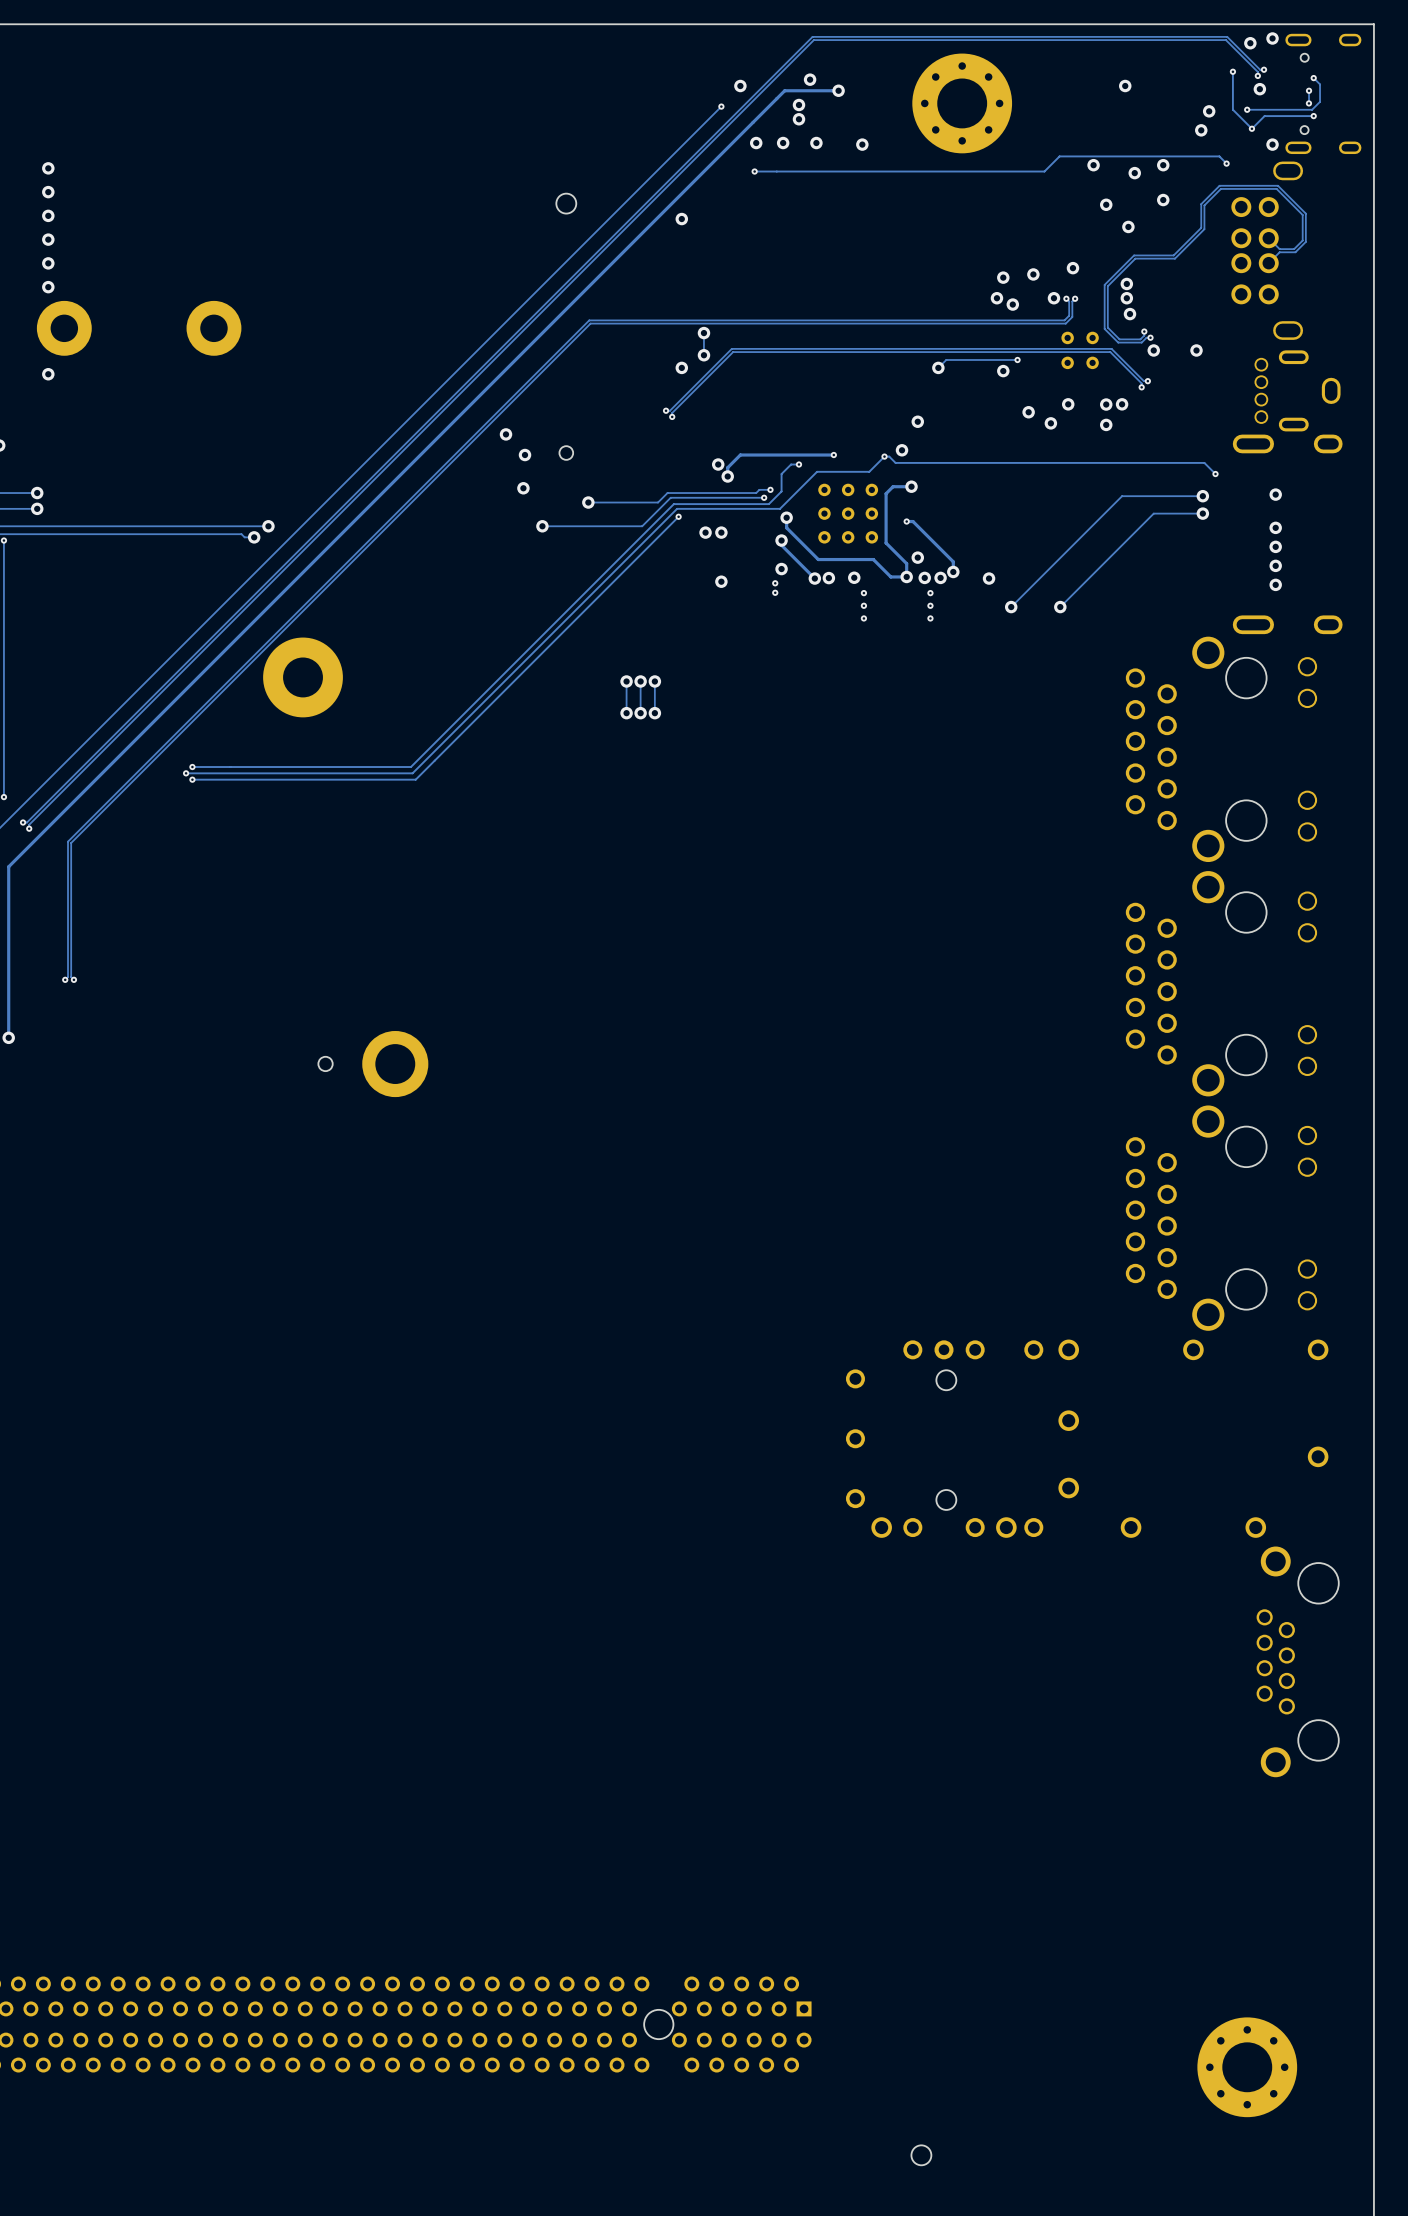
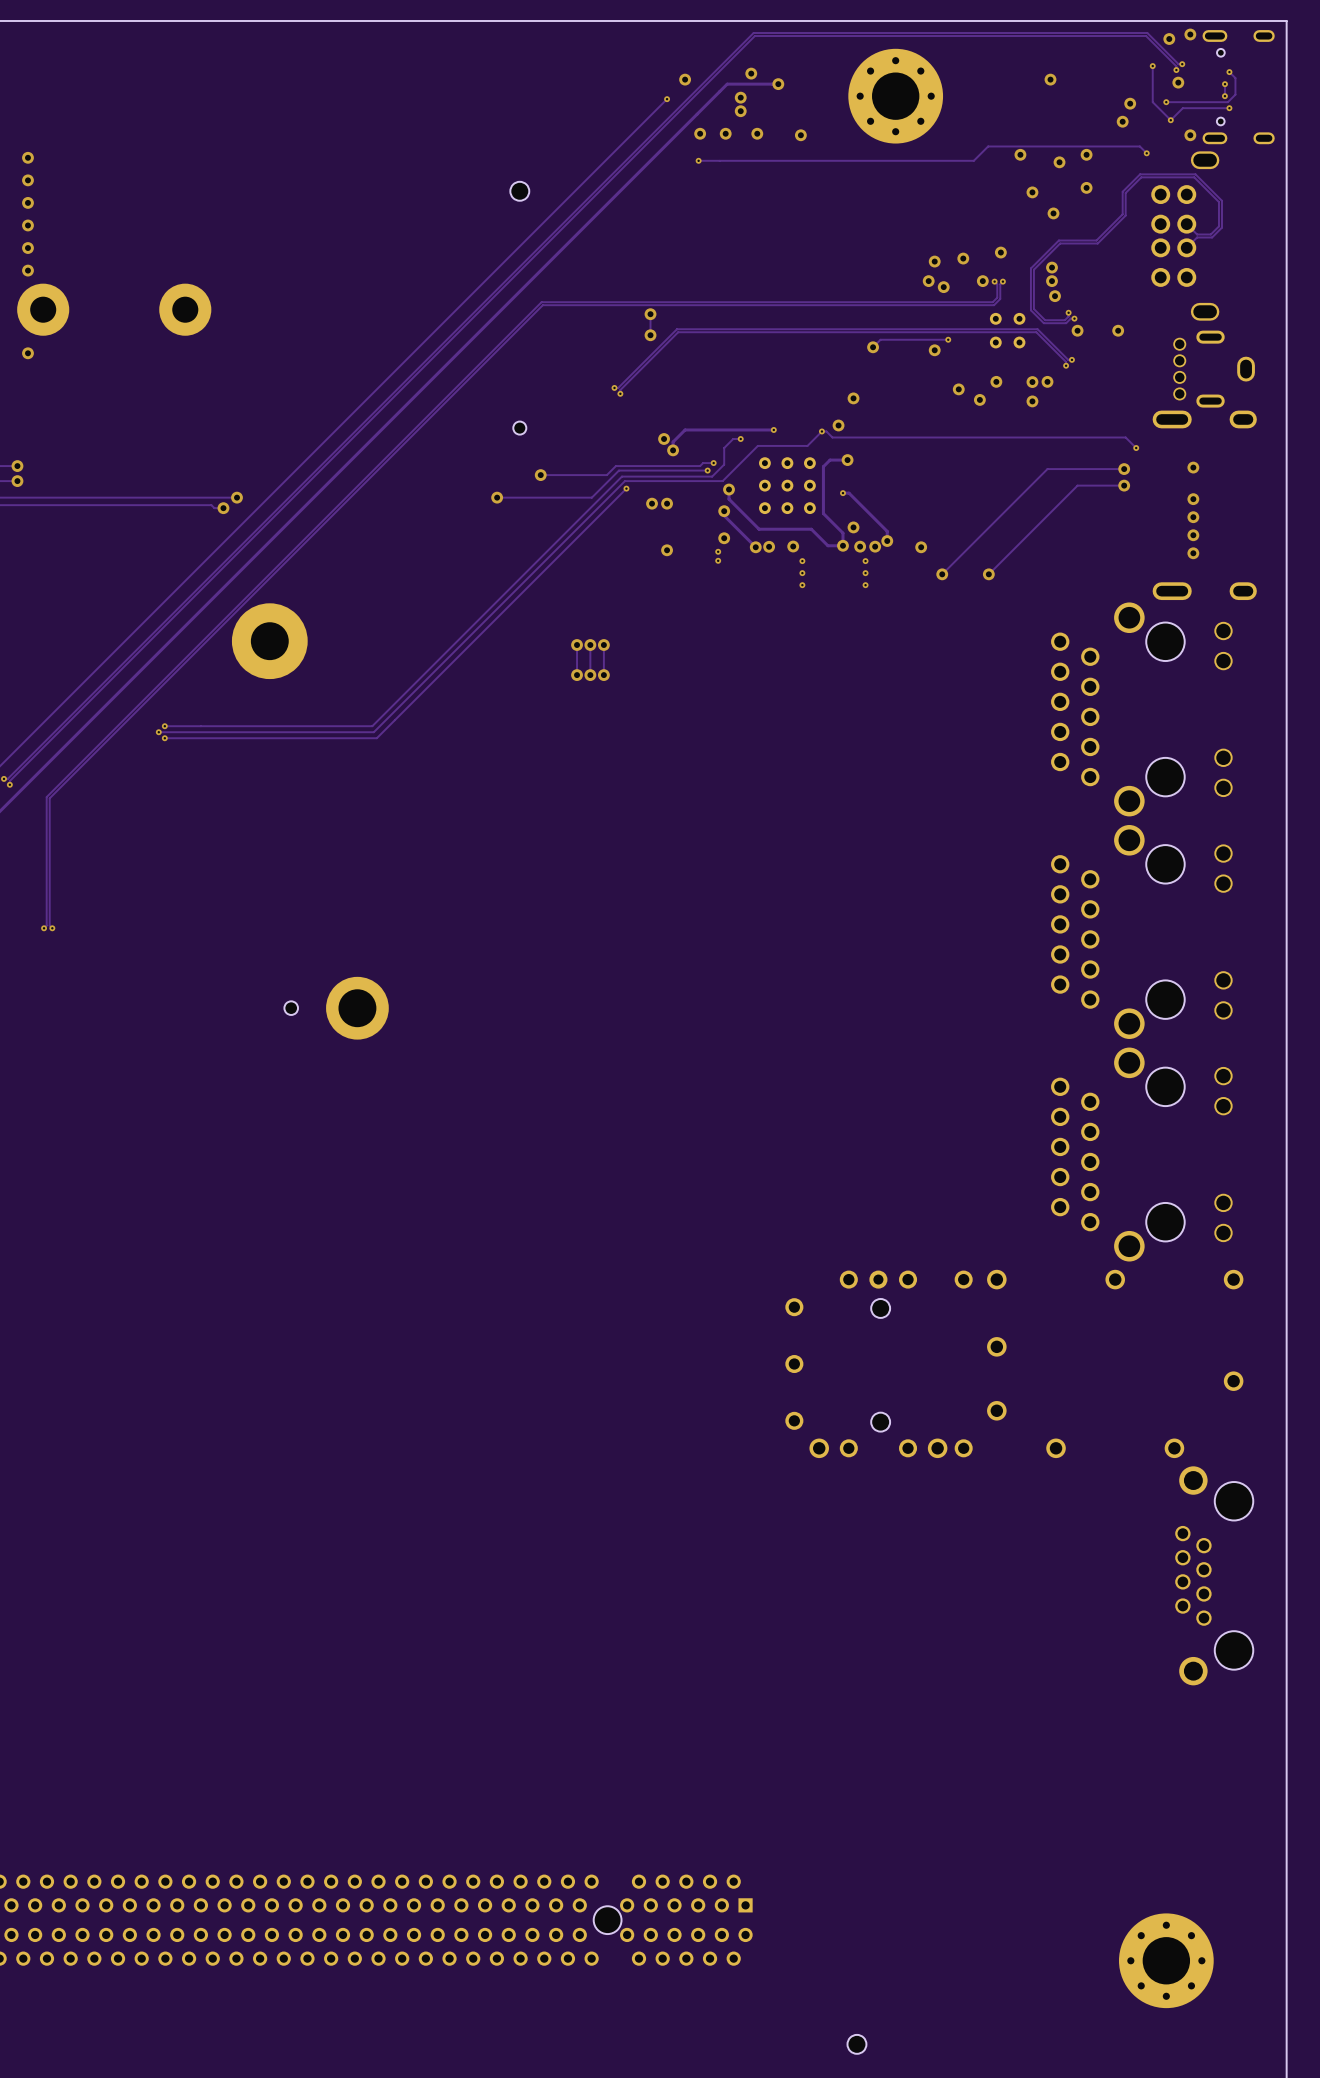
via: (681, 219) -> none
via: (681, 367) -> none
via: (506, 434) -> none
via: (525, 455) -> none
via: (523, 488) -> none

